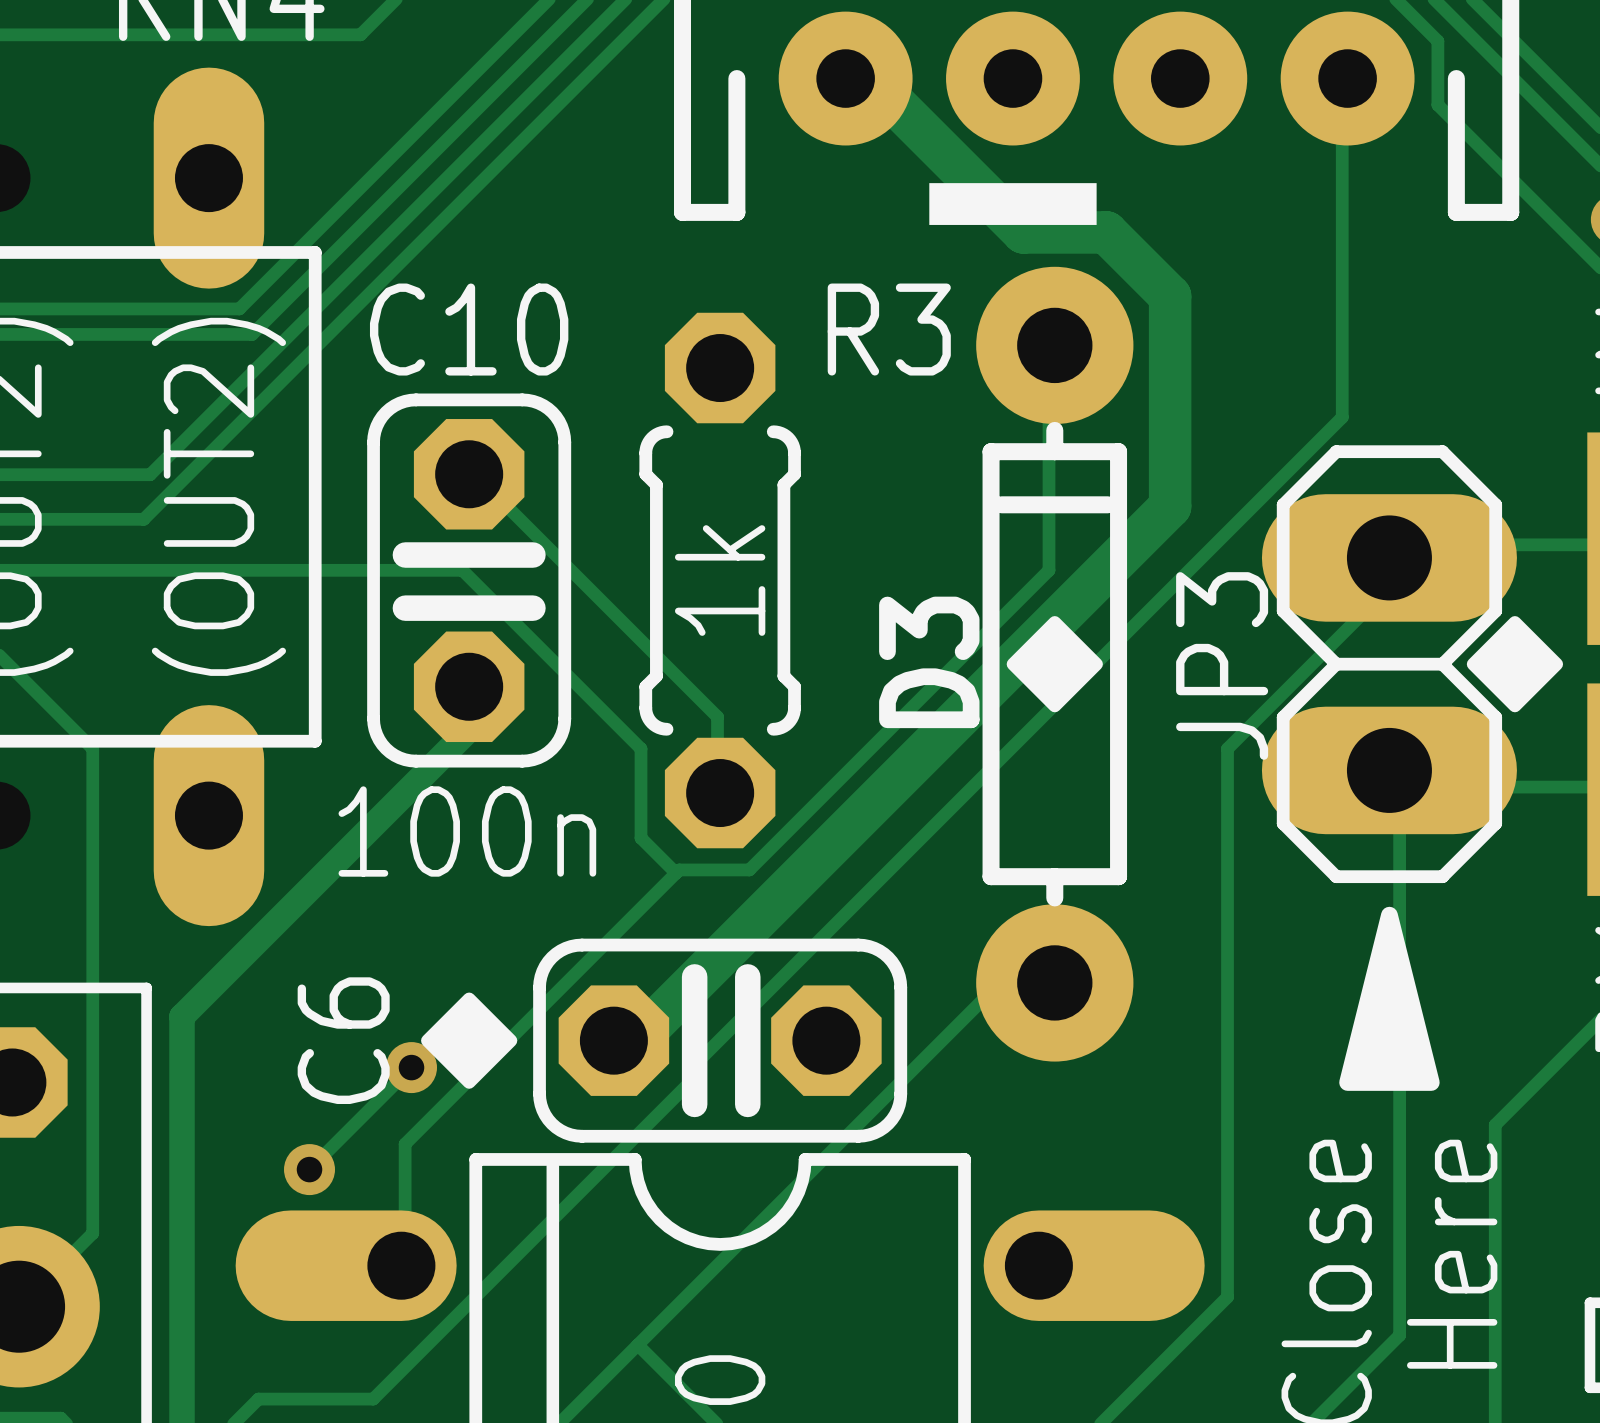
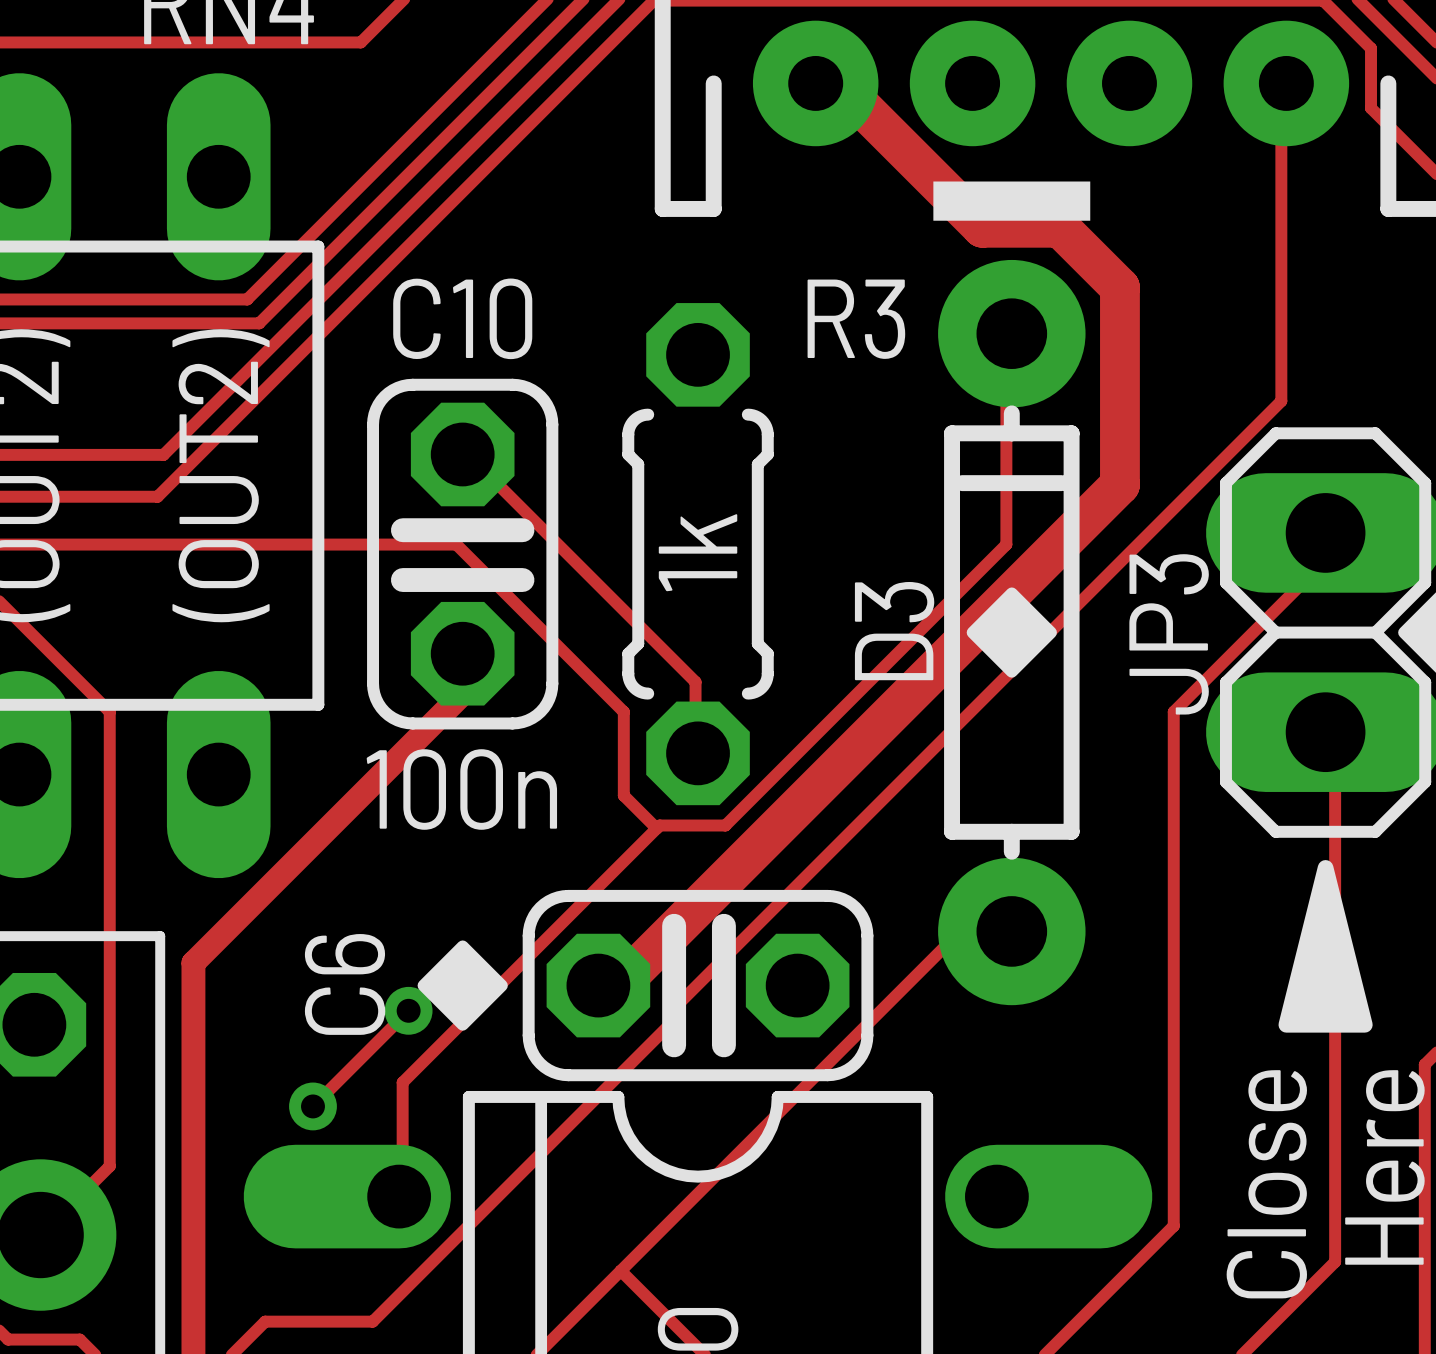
drawing position: (1012, 204) -> (1011, 201)

